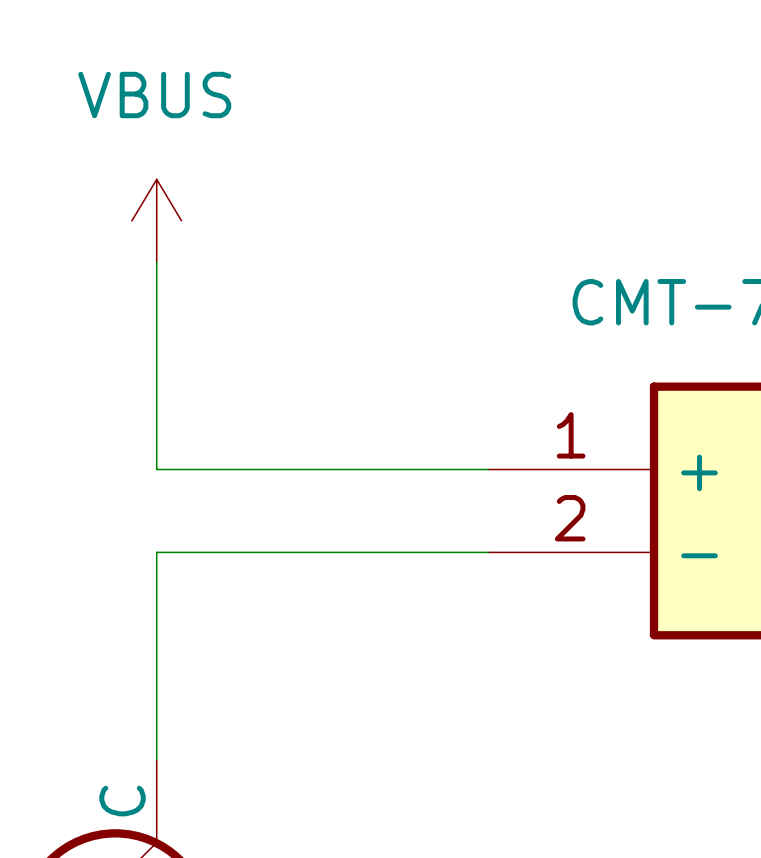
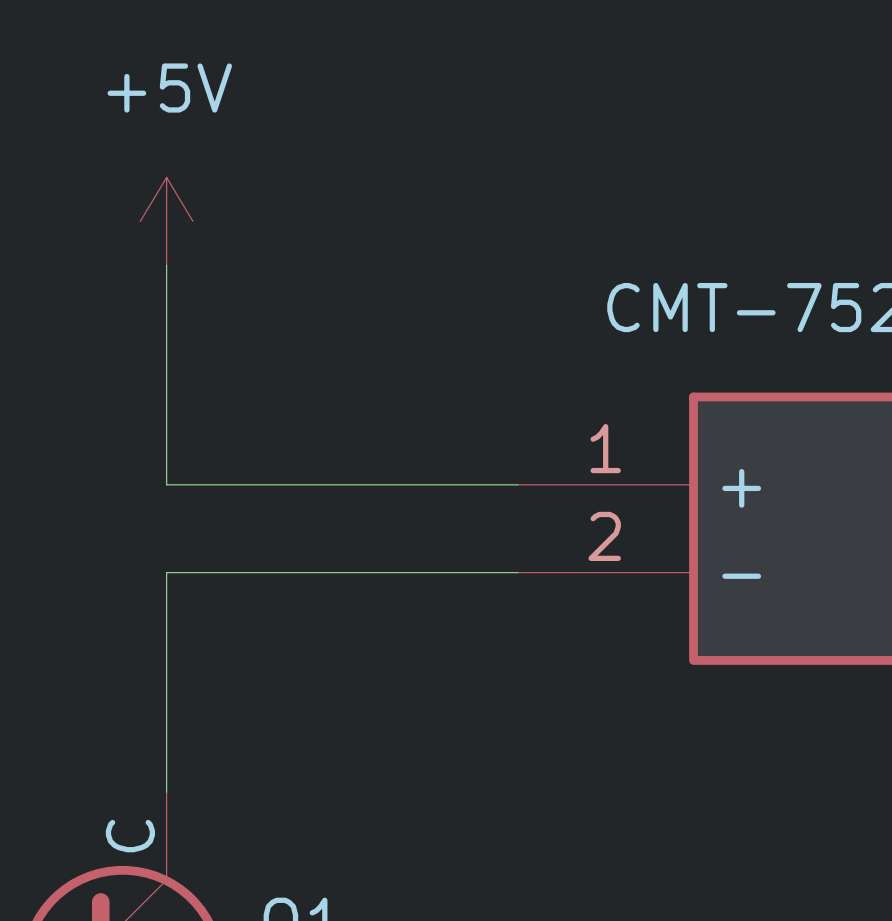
power symbol: VBUS (156, 220) -> +5V (166, 221)

